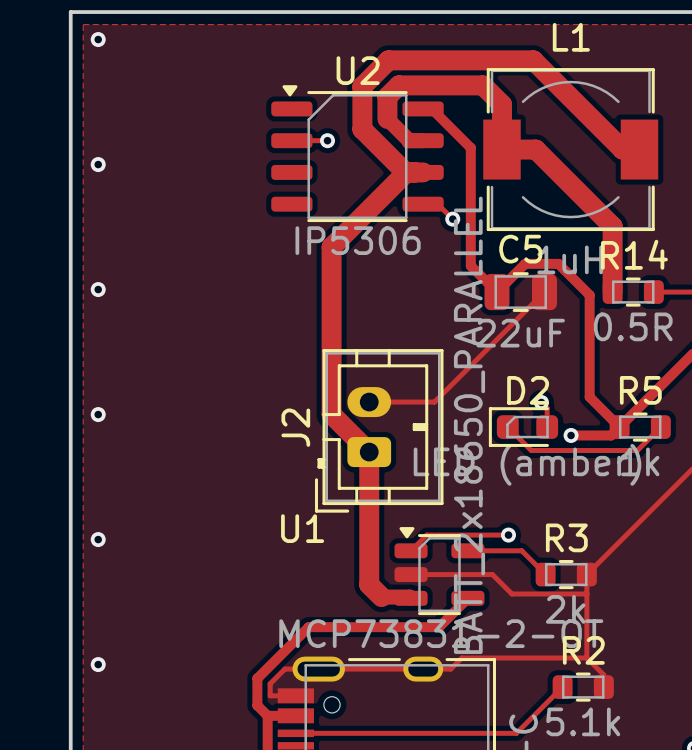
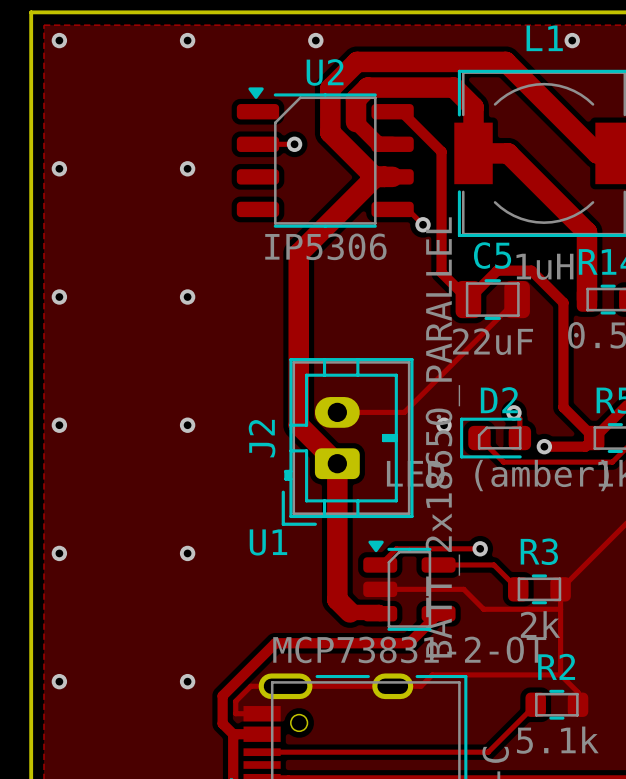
via: none -> (187, 40)
via: none -> (315, 40)
via: none -> (572, 40)
via: none -> (187, 168)
via: none -> (187, 297)
via: none -> (187, 425)
via: none -> (444, 425)
via: none -> (187, 553)
via: none -> (187, 681)

